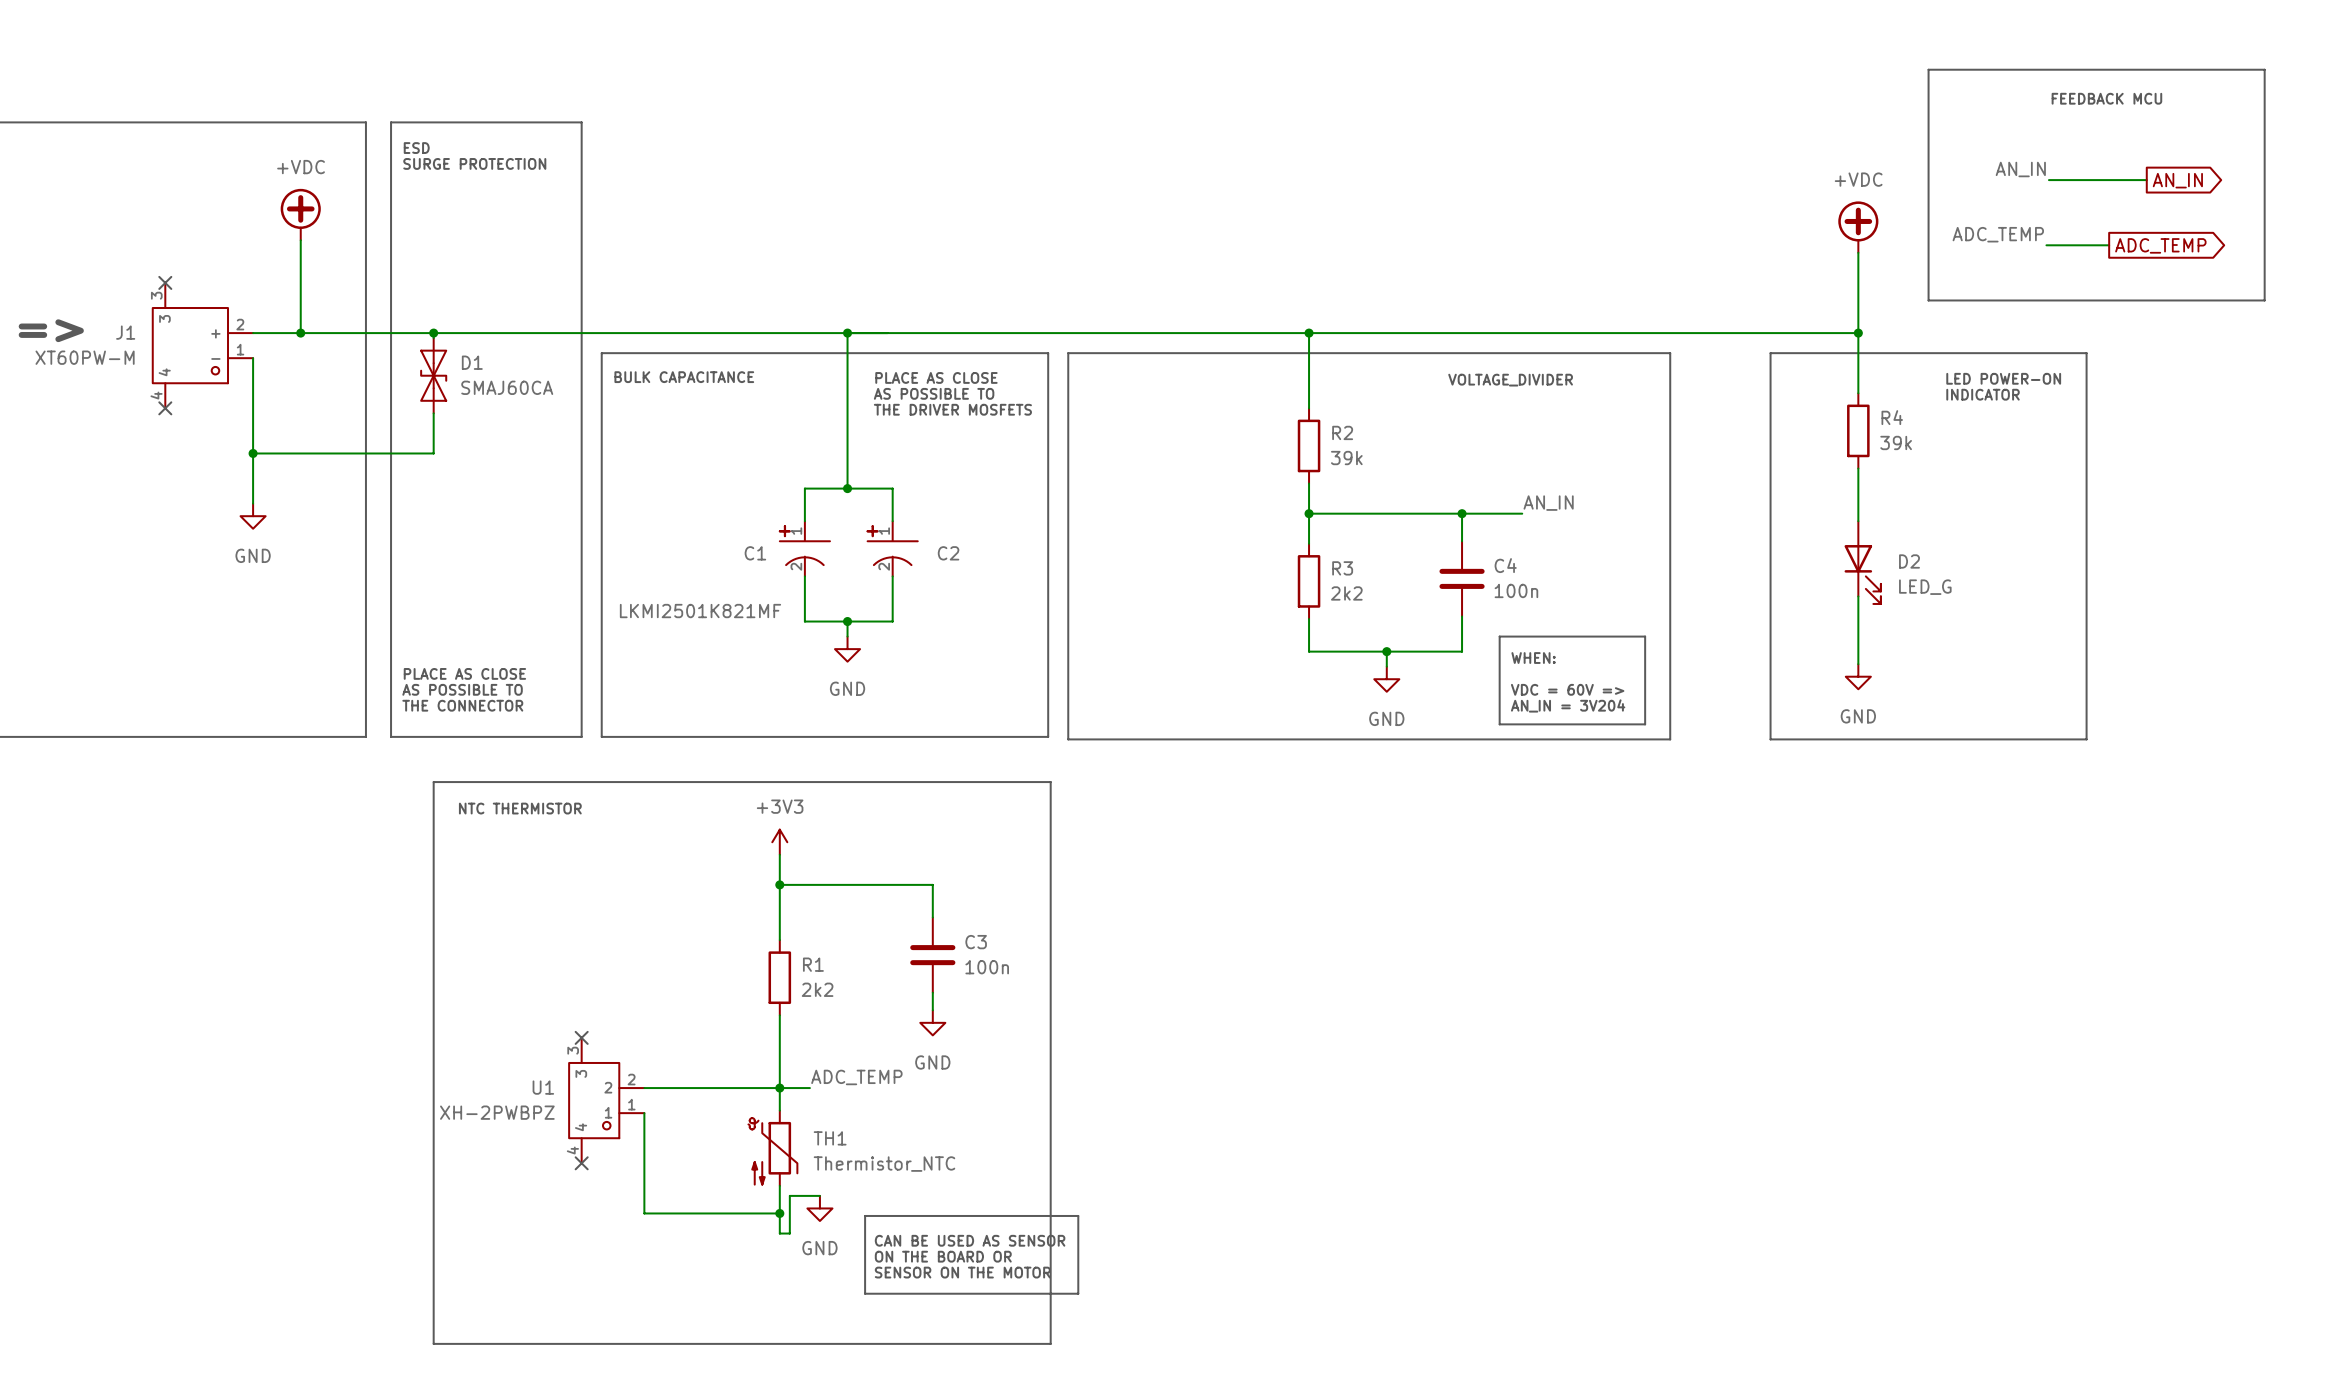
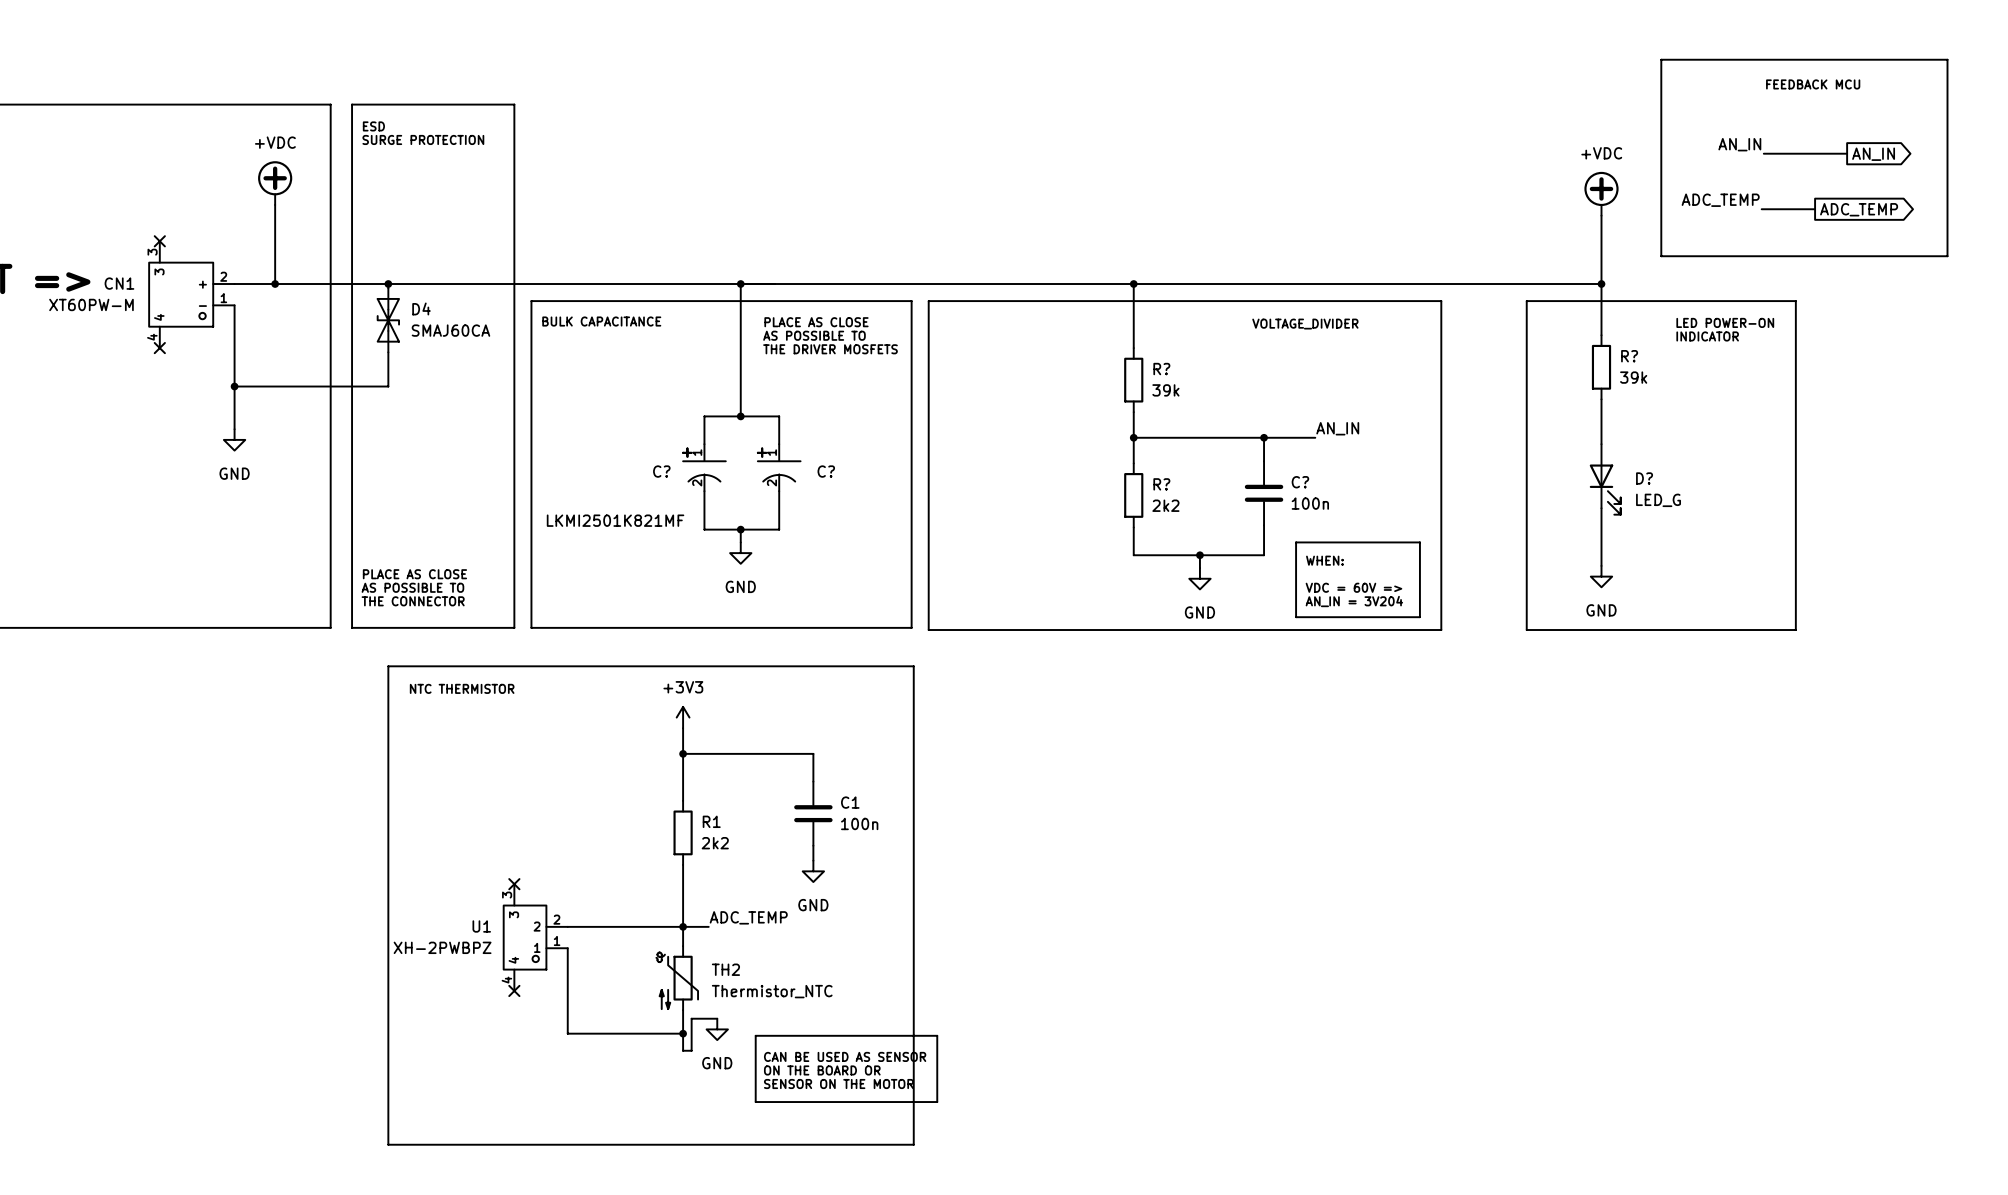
J1 name: J1 (125, 332) -> CN1 (119, 283)
D1 name: D1 (472, 362) -> D4 (421, 308)
R4 name: R4 (1892, 417) -> R? (1629, 356)
R2 name: R2 (1342, 432) -> R? (1161, 369)
C1 name: C1 (755, 553) -> C? (661, 471)
C2 name: C2 (948, 553) -> C? (826, 471)
D2 name: D2 (1909, 561) -> D? (1644, 478)
C4 name: C4 (1505, 565) -> C? (1300, 482)
R3 name: R3 (1342, 568) -> R? (1161, 484)
C3 name: C3 (976, 942) -> C1 (850, 802)
TH1 name: TH1 (830, 1138) -> TH2 (725, 969)

